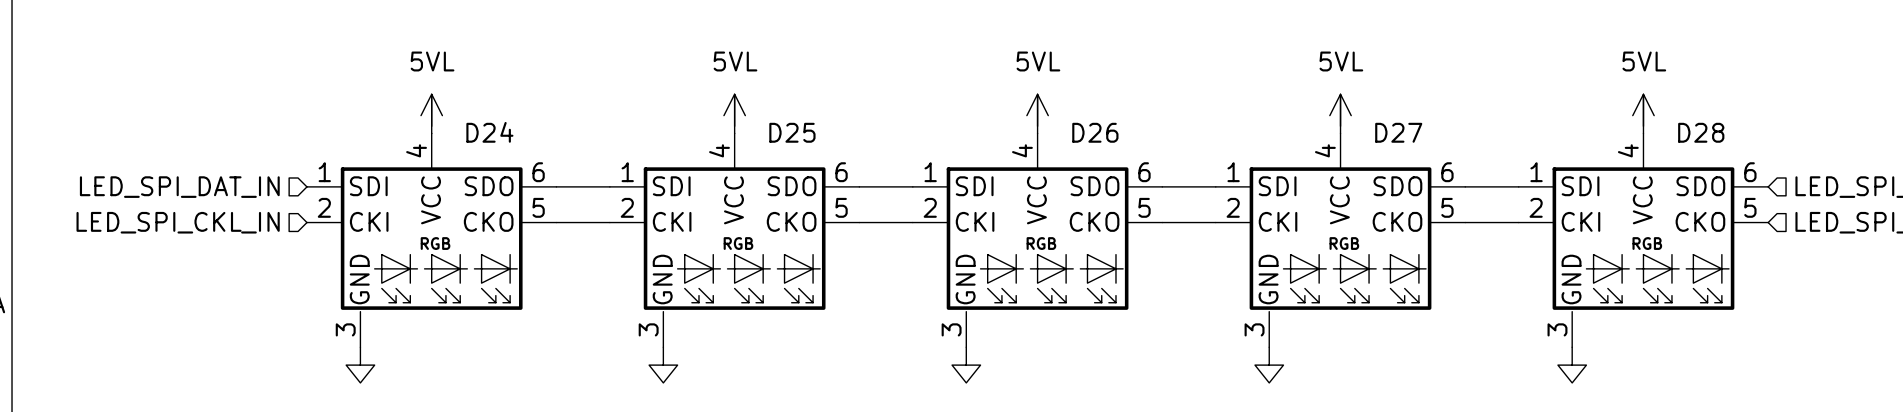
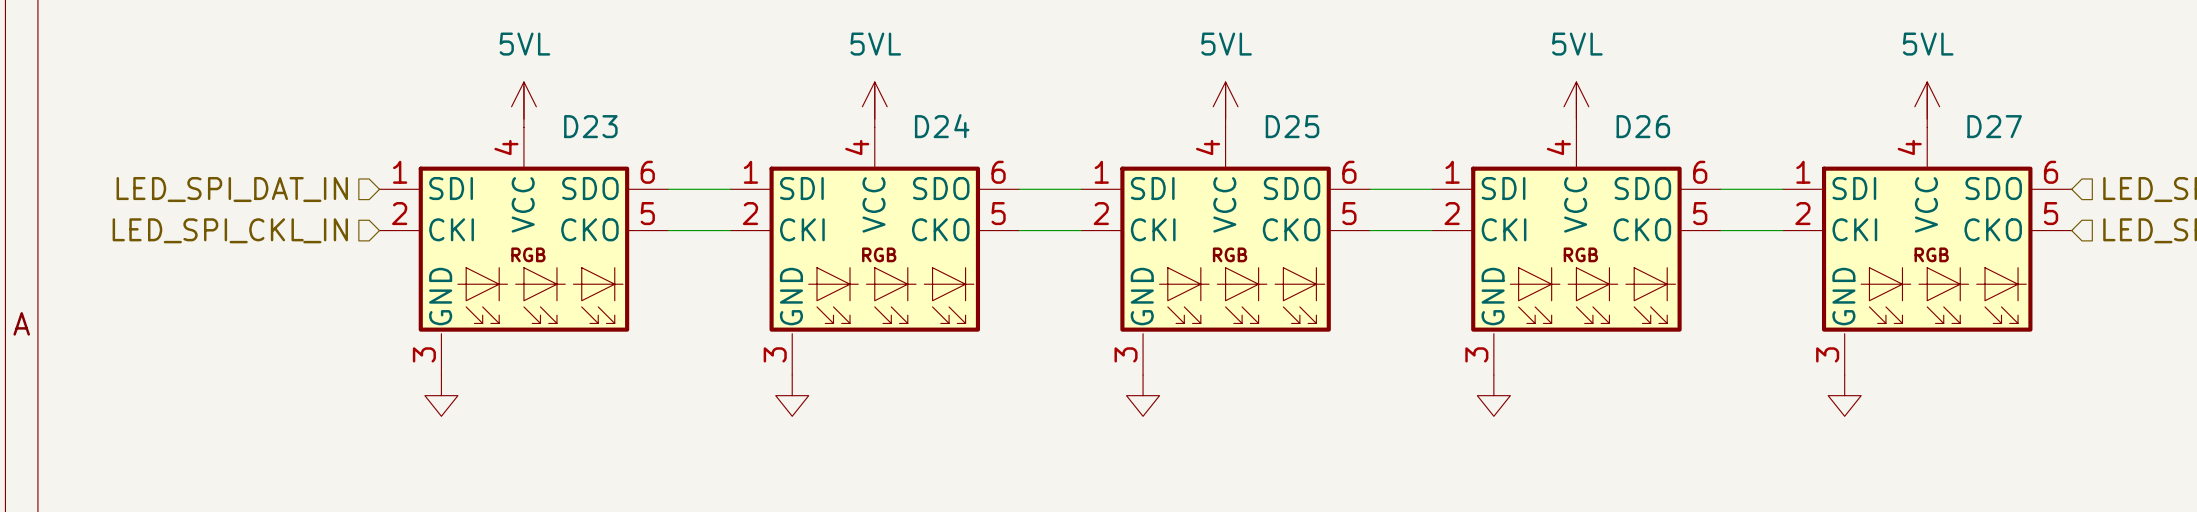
D24 name: D24 (489, 132) -> D23 (590, 126)
D25 name: D25 (792, 132) -> D24 (942, 126)
D26 name: D26 (1095, 132) -> D25 (1292, 126)
D27 name: D27 (1398, 132) -> D26 (1643, 126)
D28 name: D28 (1701, 132) -> D27 (1994, 126)

